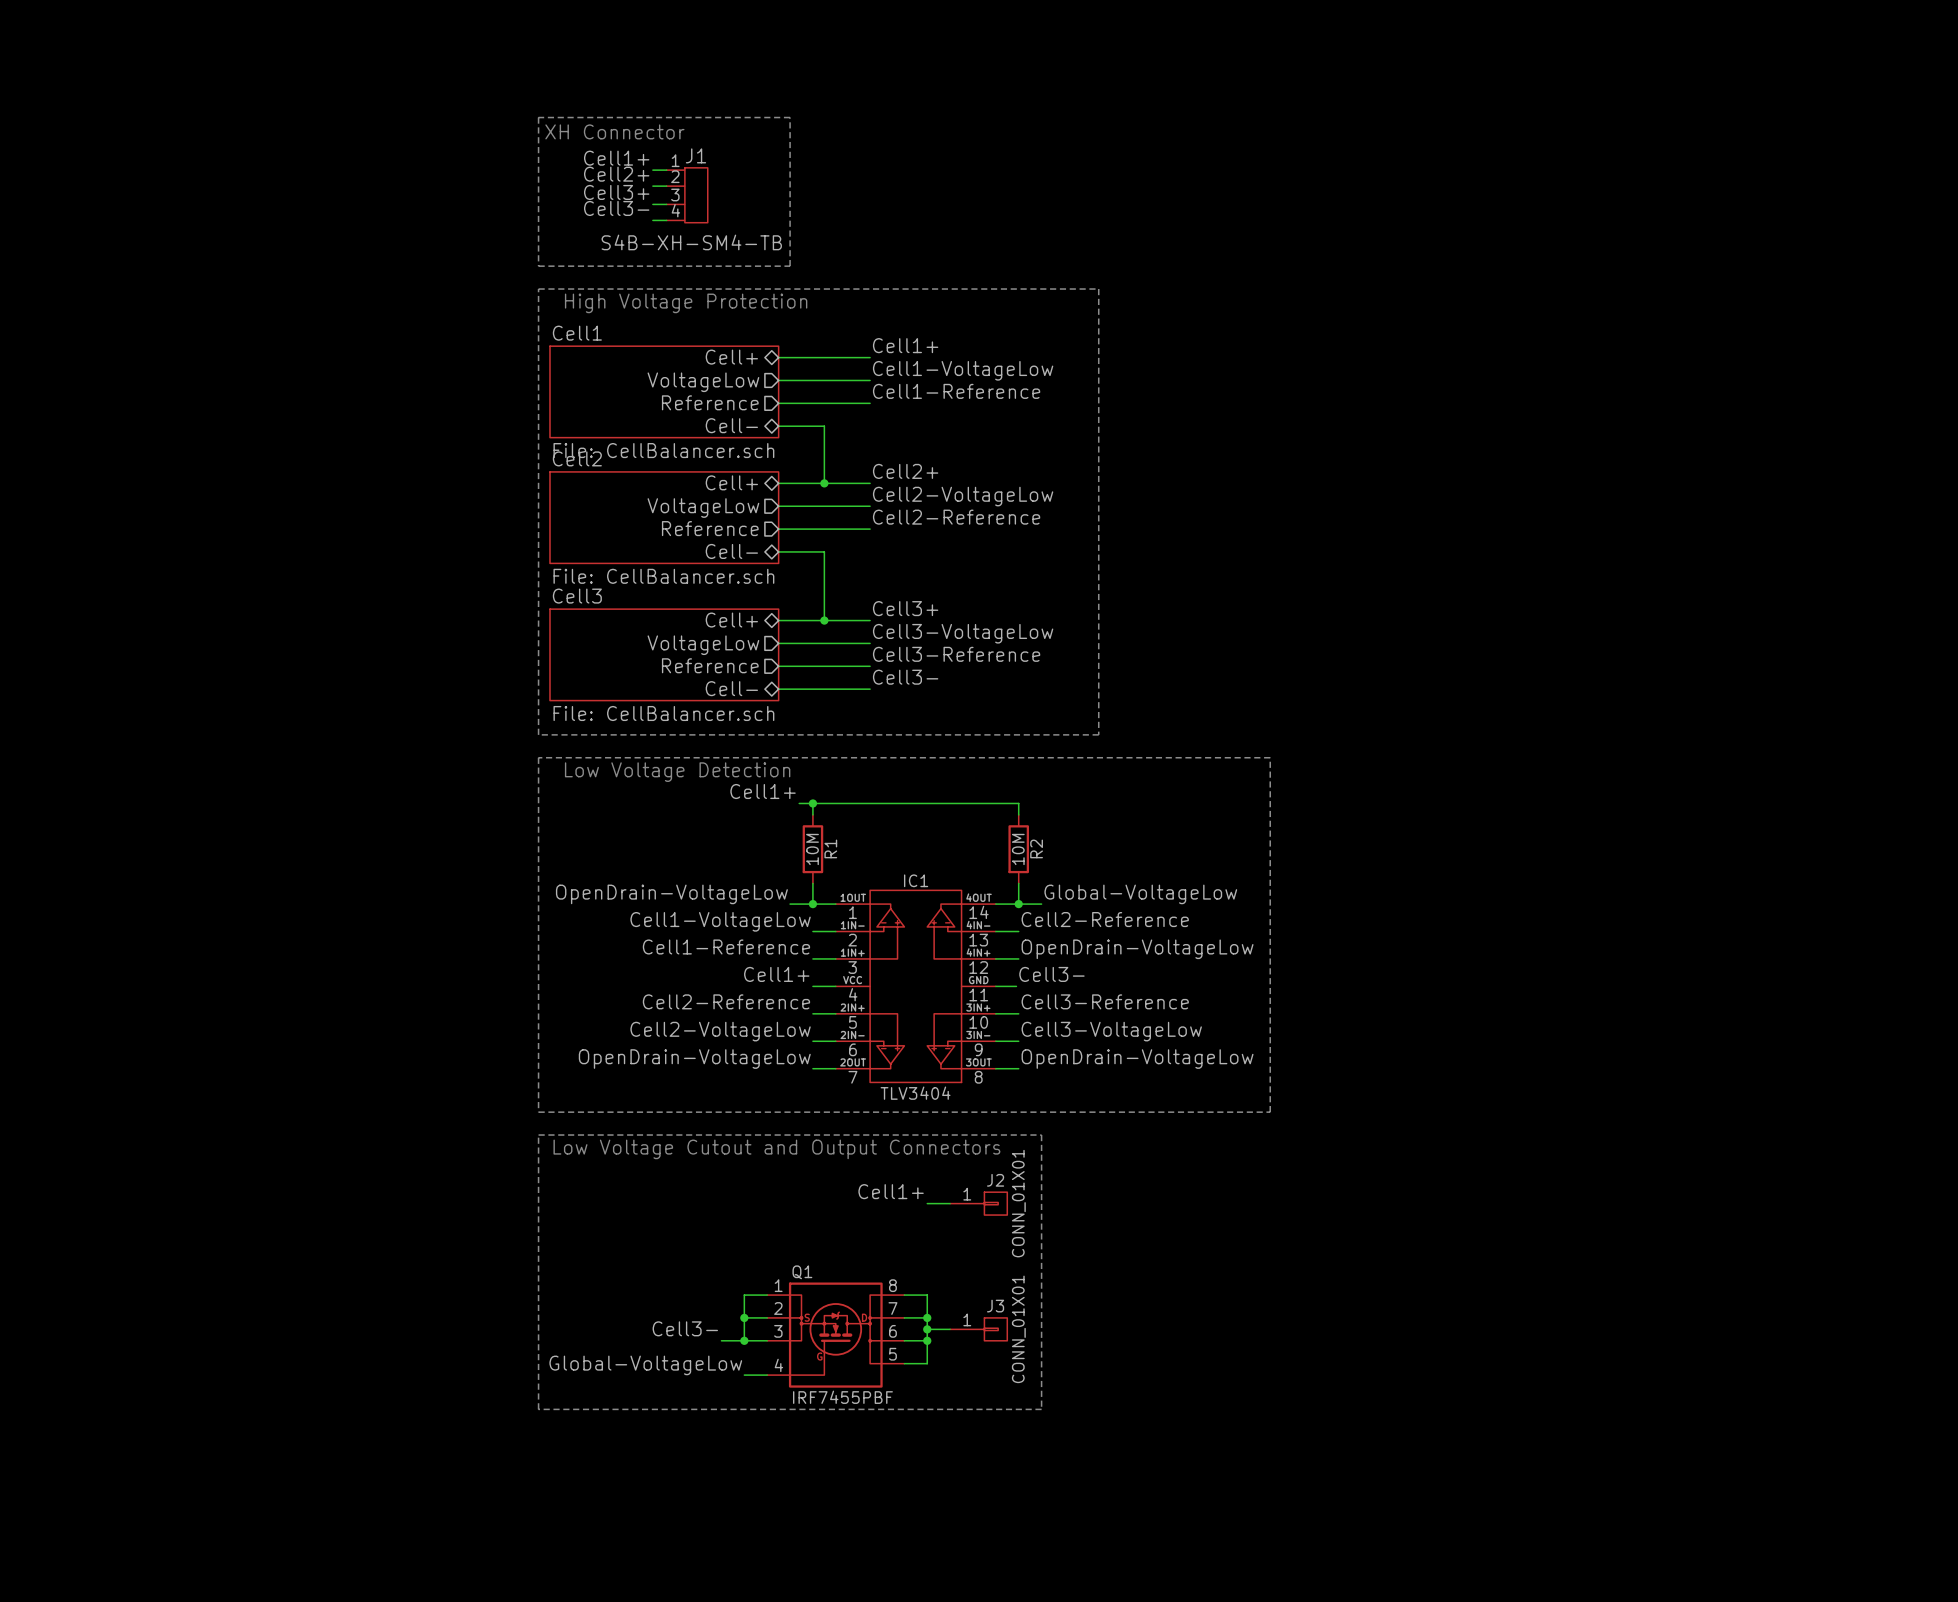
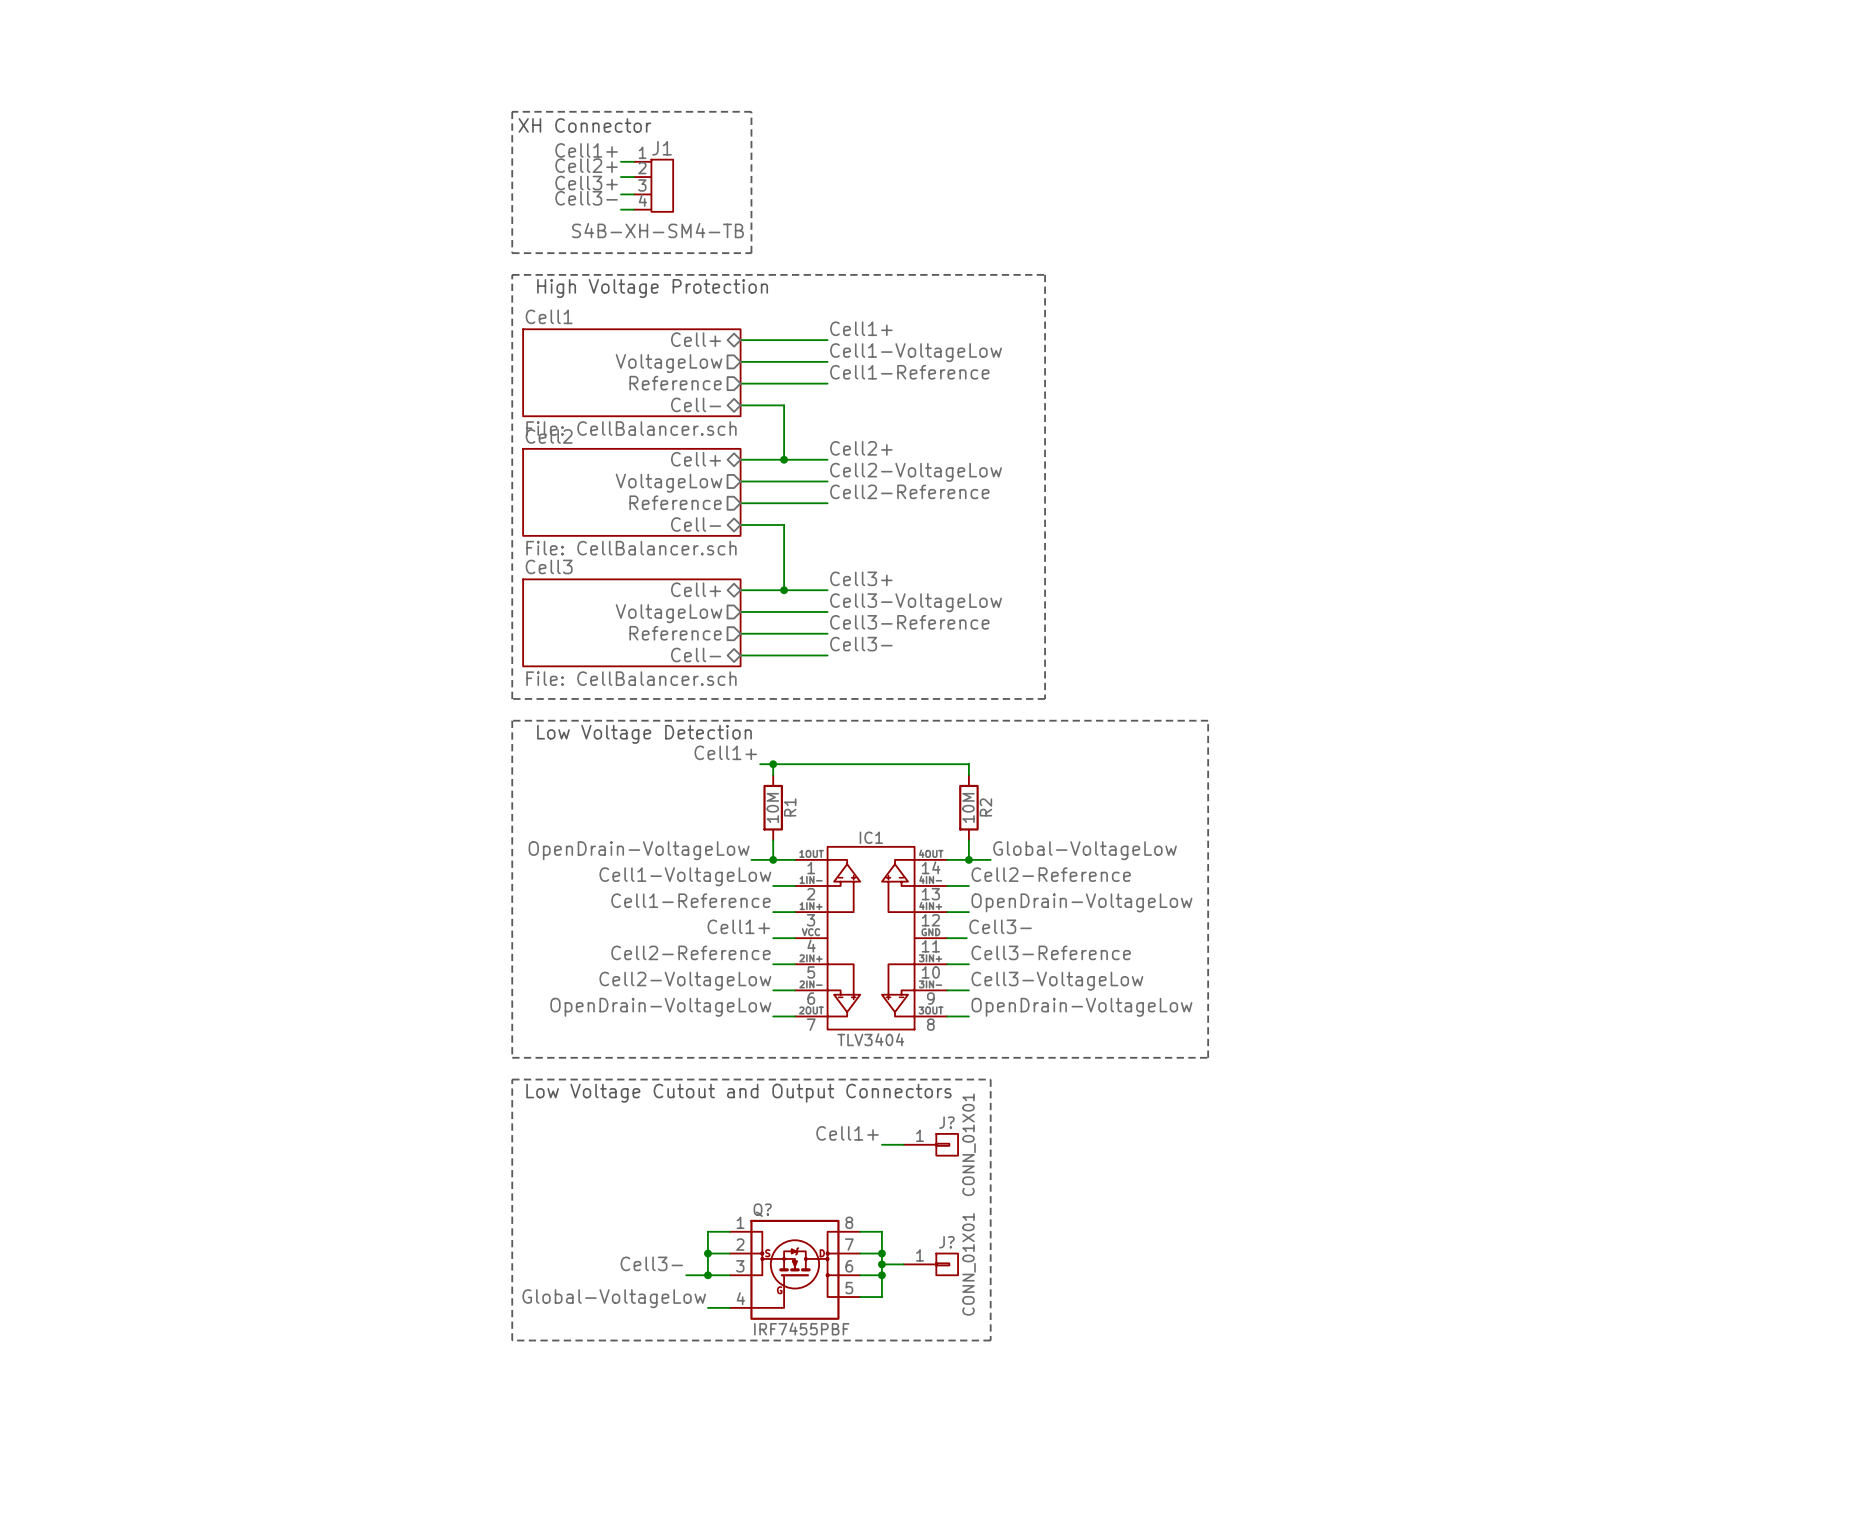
J2 name: J2 (995, 1180) -> J? (946, 1122)
Q1 name: Q1 (802, 1272) -> Q? (762, 1210)
J3 name: J3 (995, 1306) -> J? (946, 1242)

